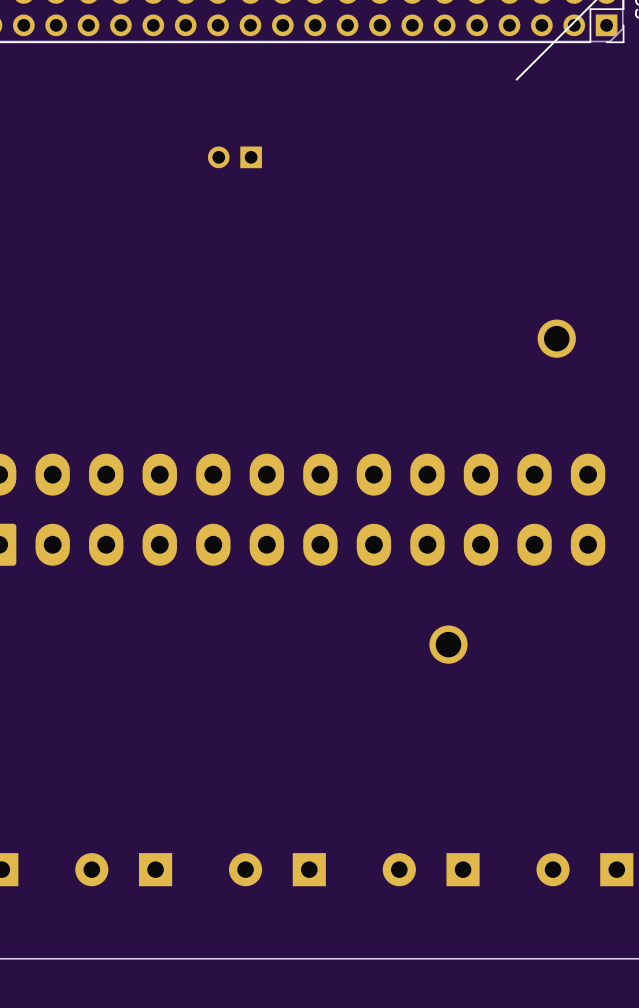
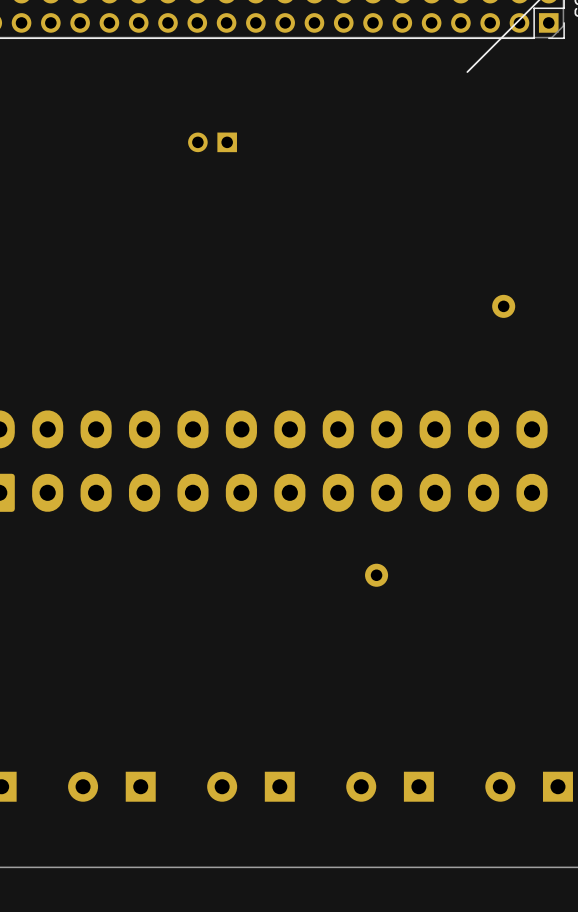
part footprint: [537, 319, 576, 358] -> [492, 294, 516, 318]
part: none -> (376, 575)
part: (448, 644) -> none

